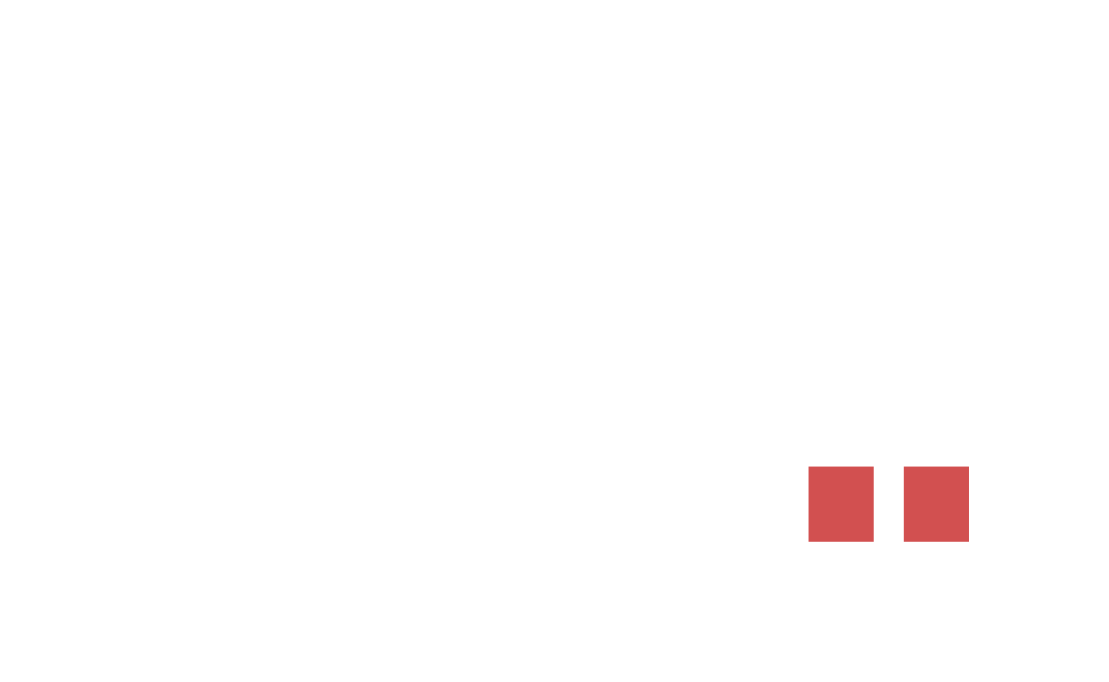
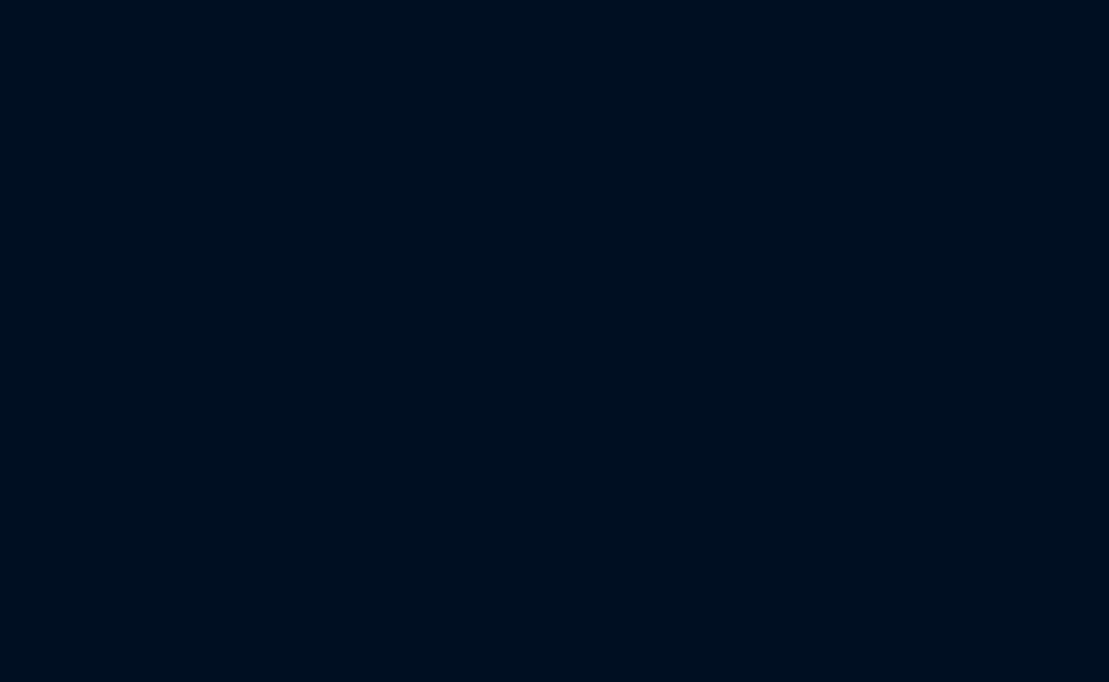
part: (888, 504) -> none

